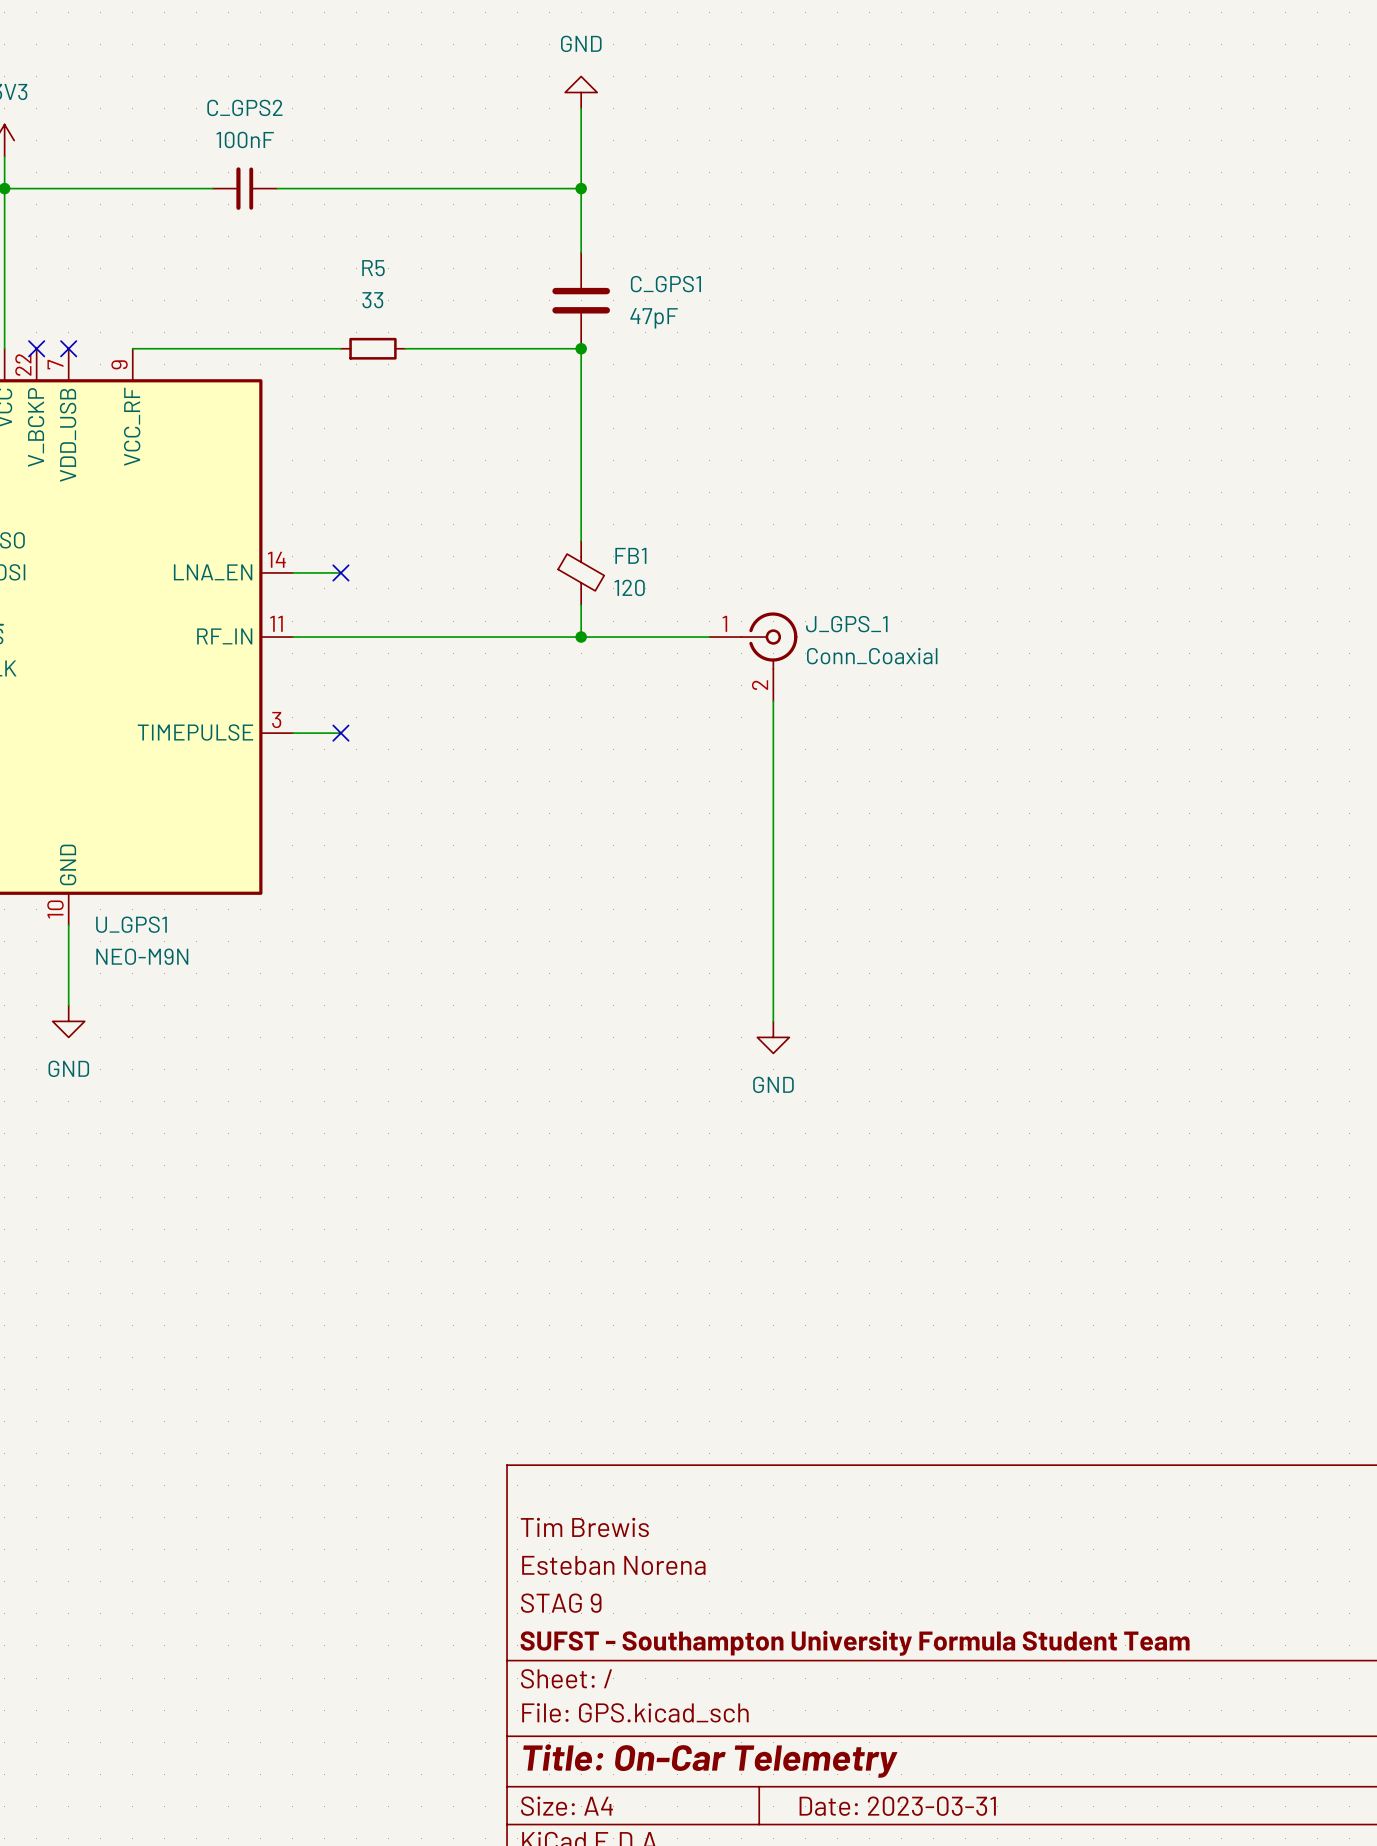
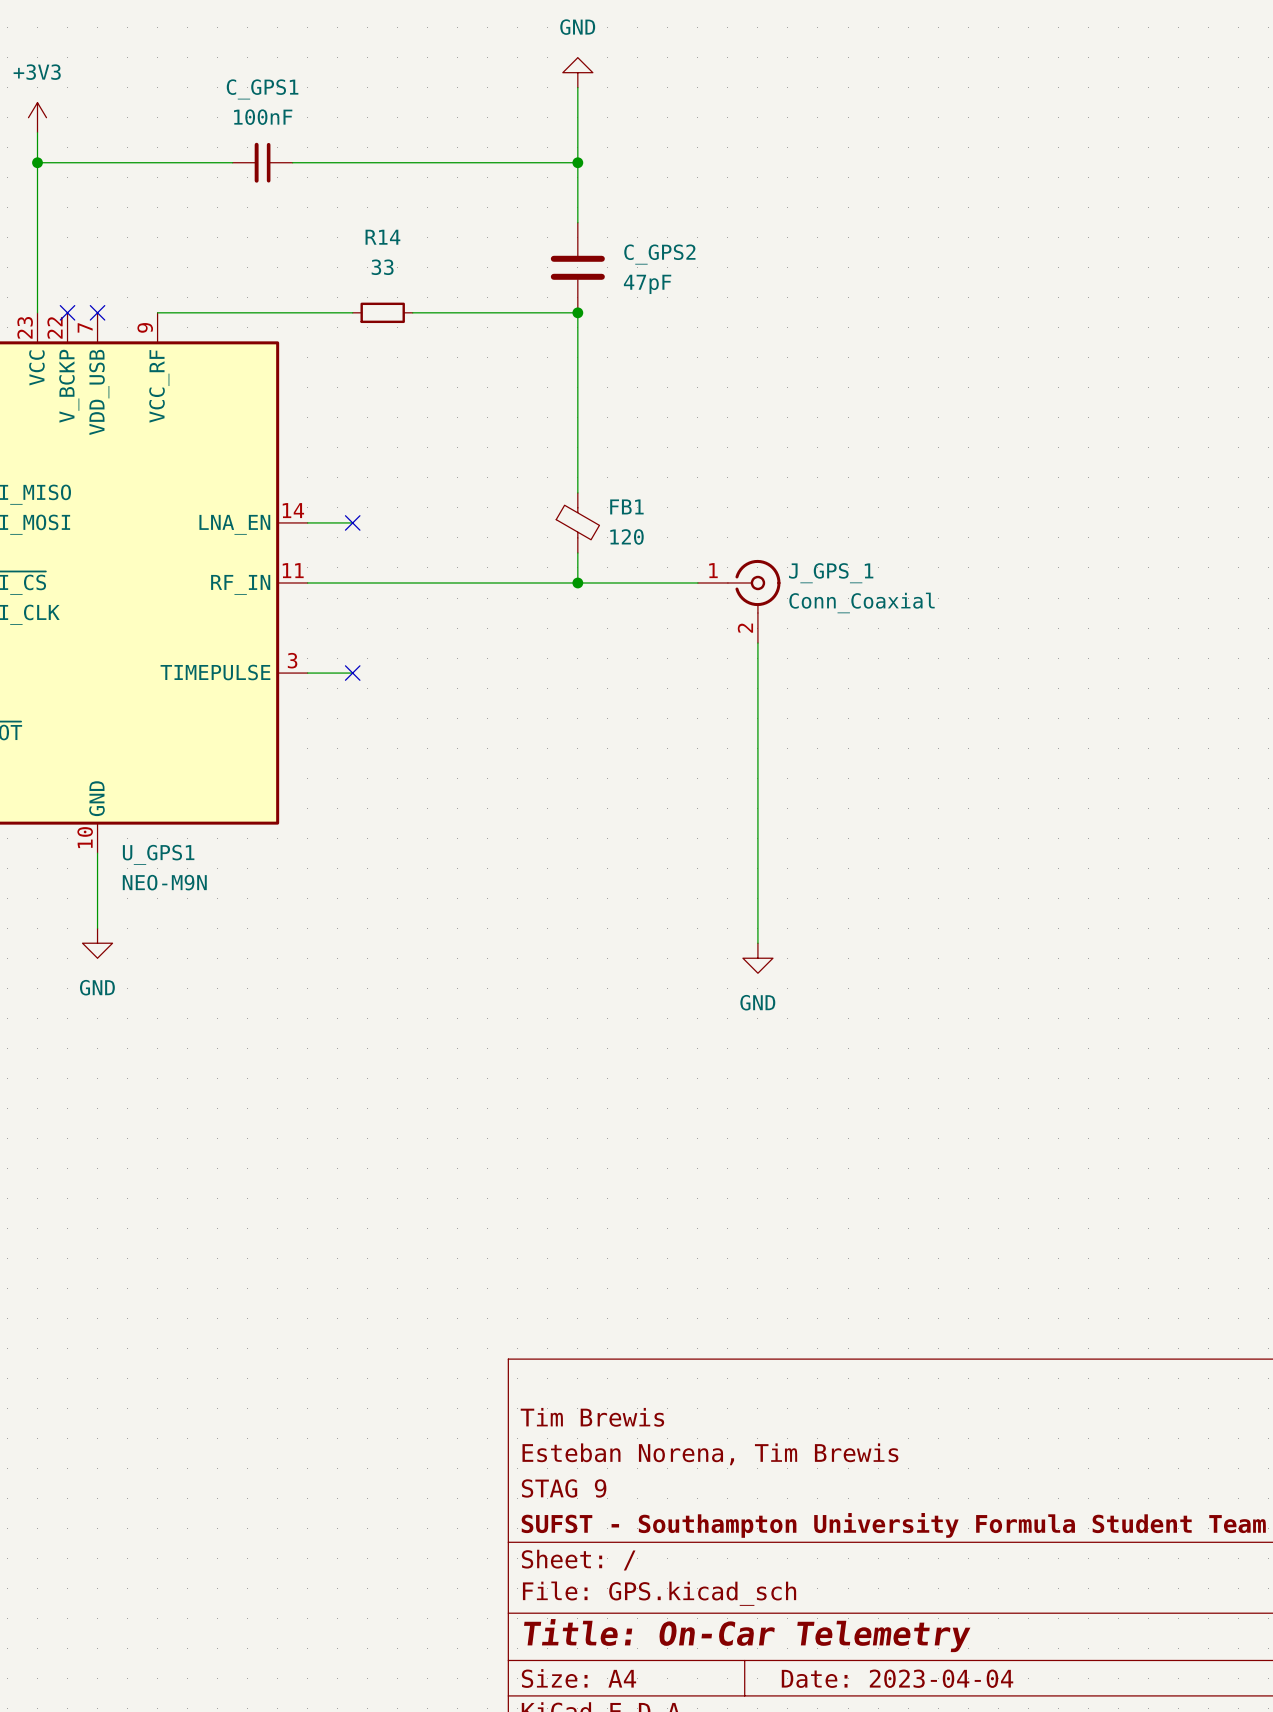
C_GPS2 name: C_GPS2 (244, 107) -> C_GPS1 (262, 89)
R5 name: R5 (373, 268) -> R14 (382, 237)
C_GPS1 name: C_GPS1 (665, 284) -> C_GPS2 (659, 254)
title block: Esteban Norena (613, 1565) -> Esteban Norena, Tim Brewis (710, 1454)
title block: Date: 2023-03-31 (897, 1806) -> Date: 2023-04-04 (897, 1678)

